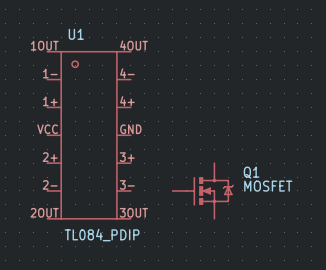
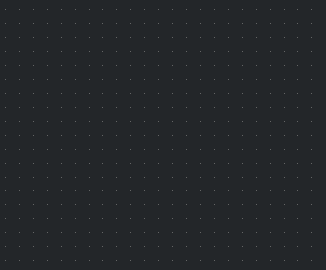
U1: TL084_PDIP (89, 135) -> none
Q1: MOSFET (203, 190) -> none

